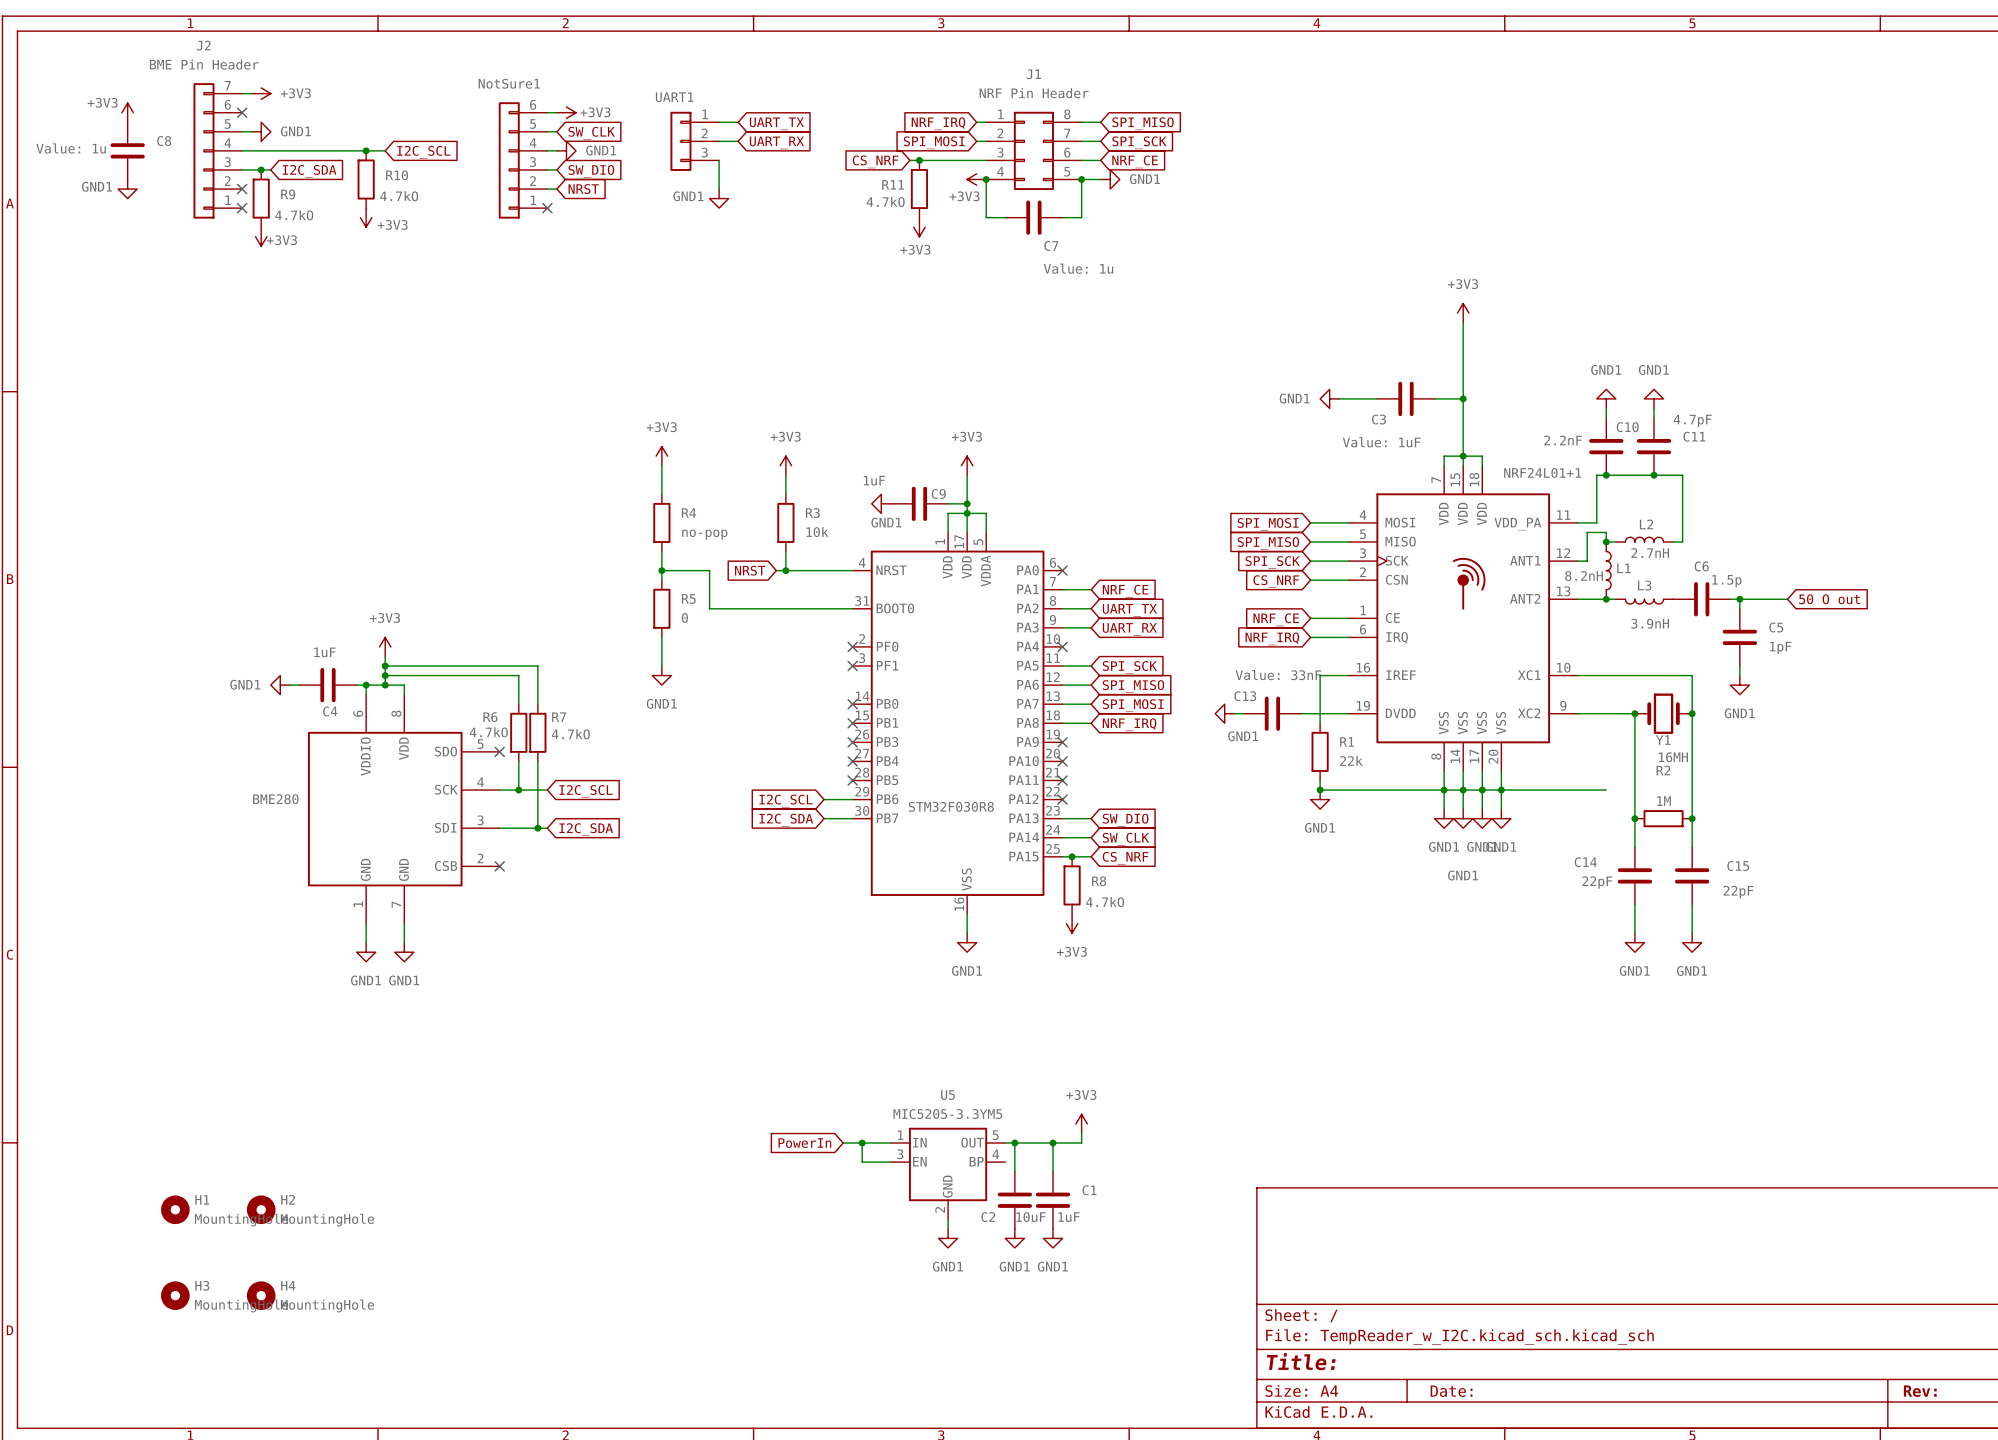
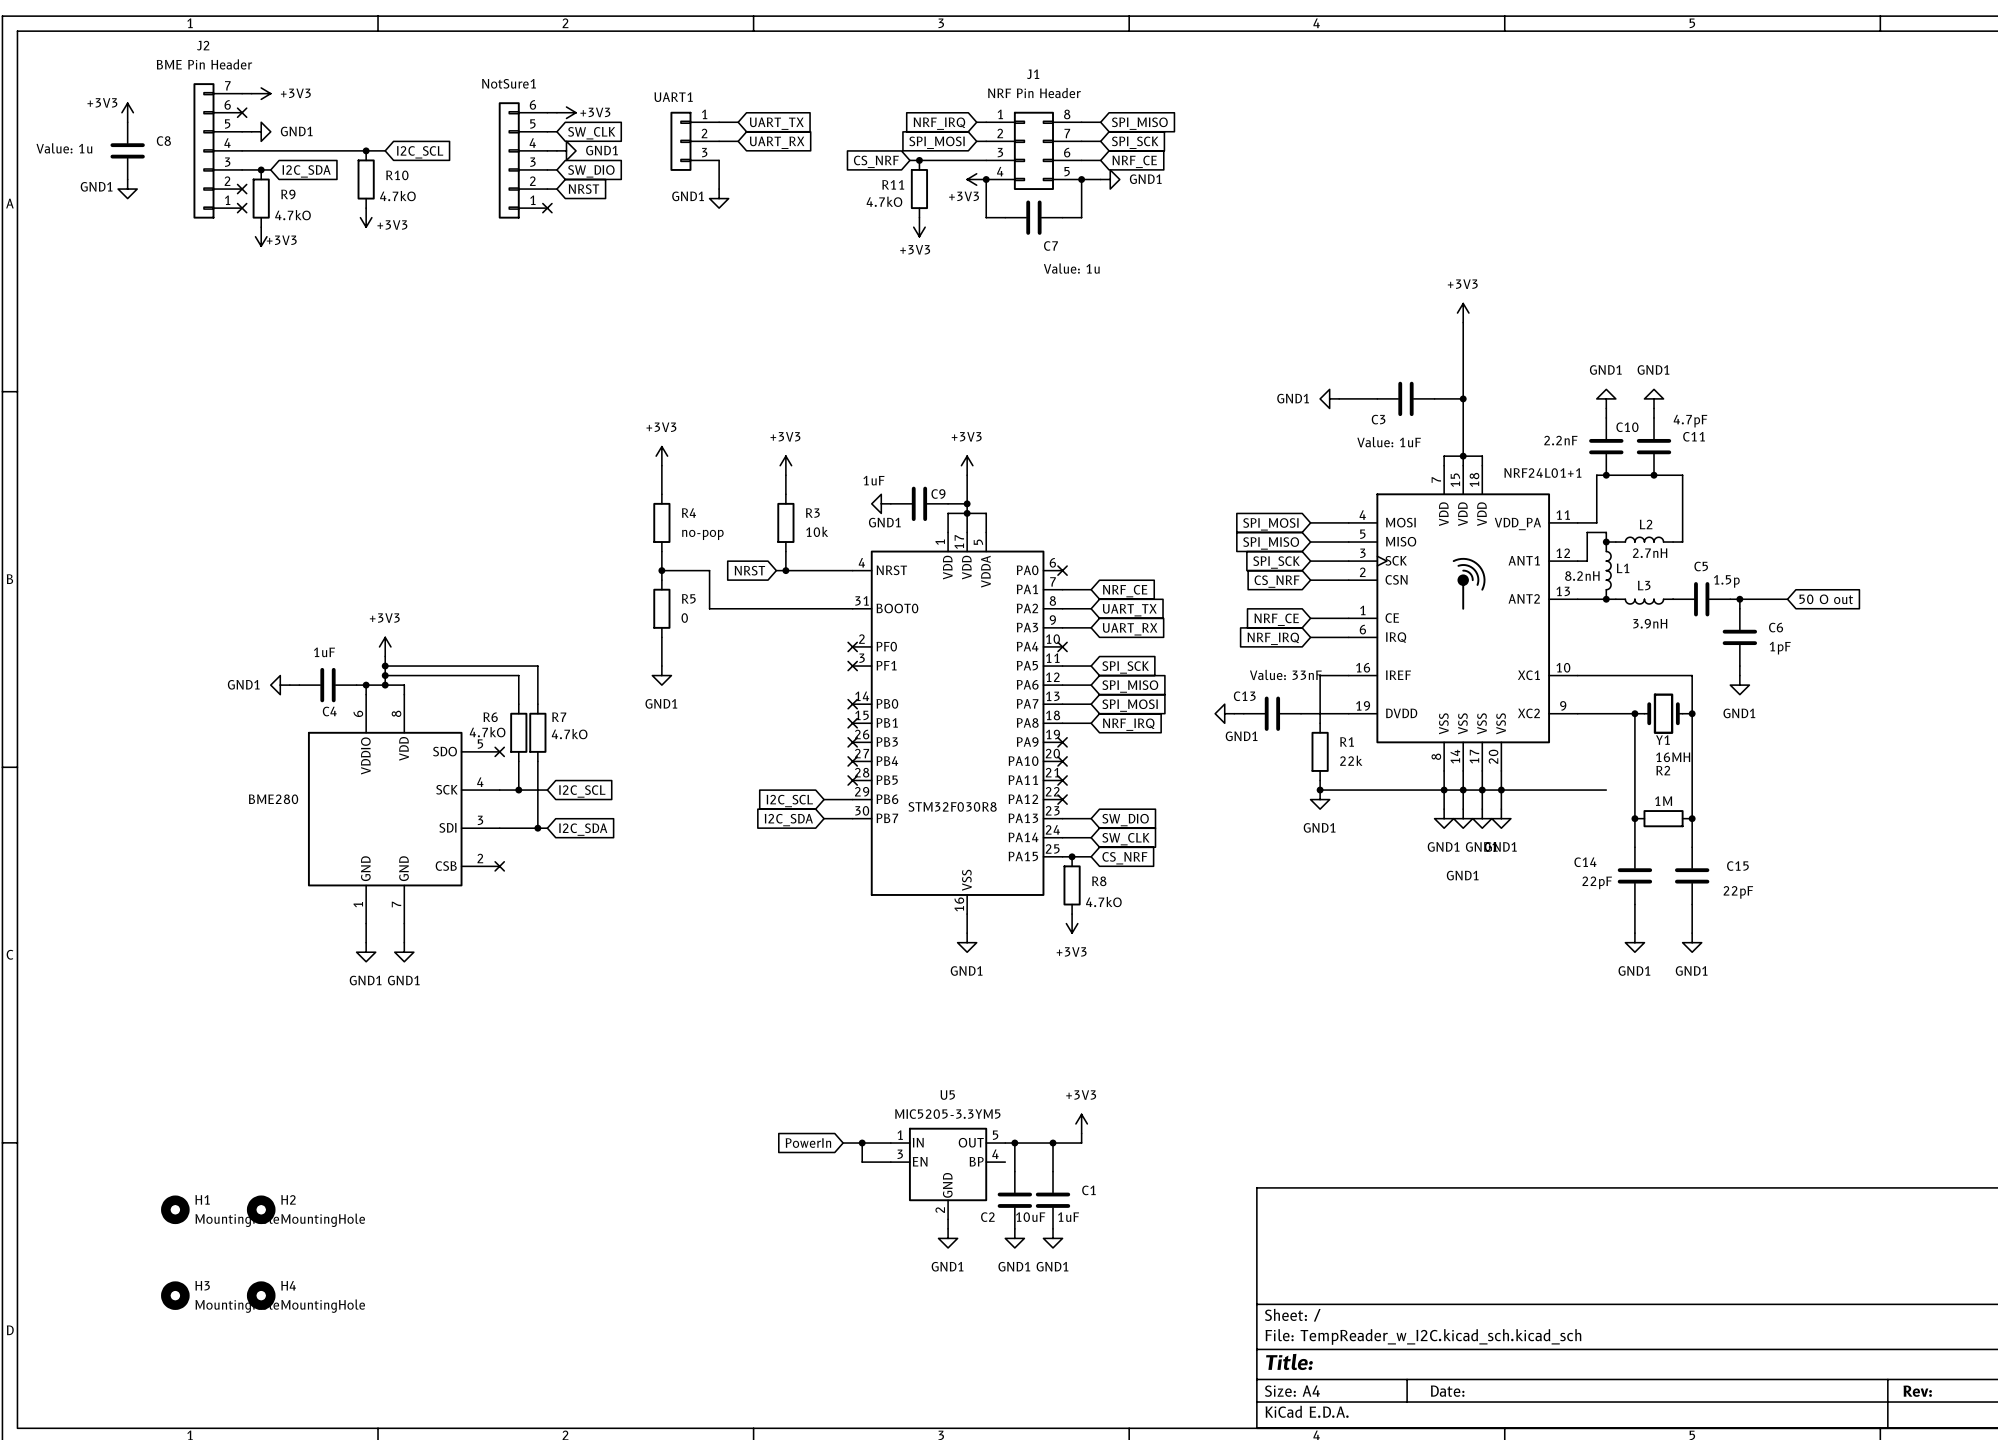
C6 name: C6 (1701, 566) -> C5 (1701, 566)
C5 name: C5 (1776, 627) -> C6 (1776, 627)

